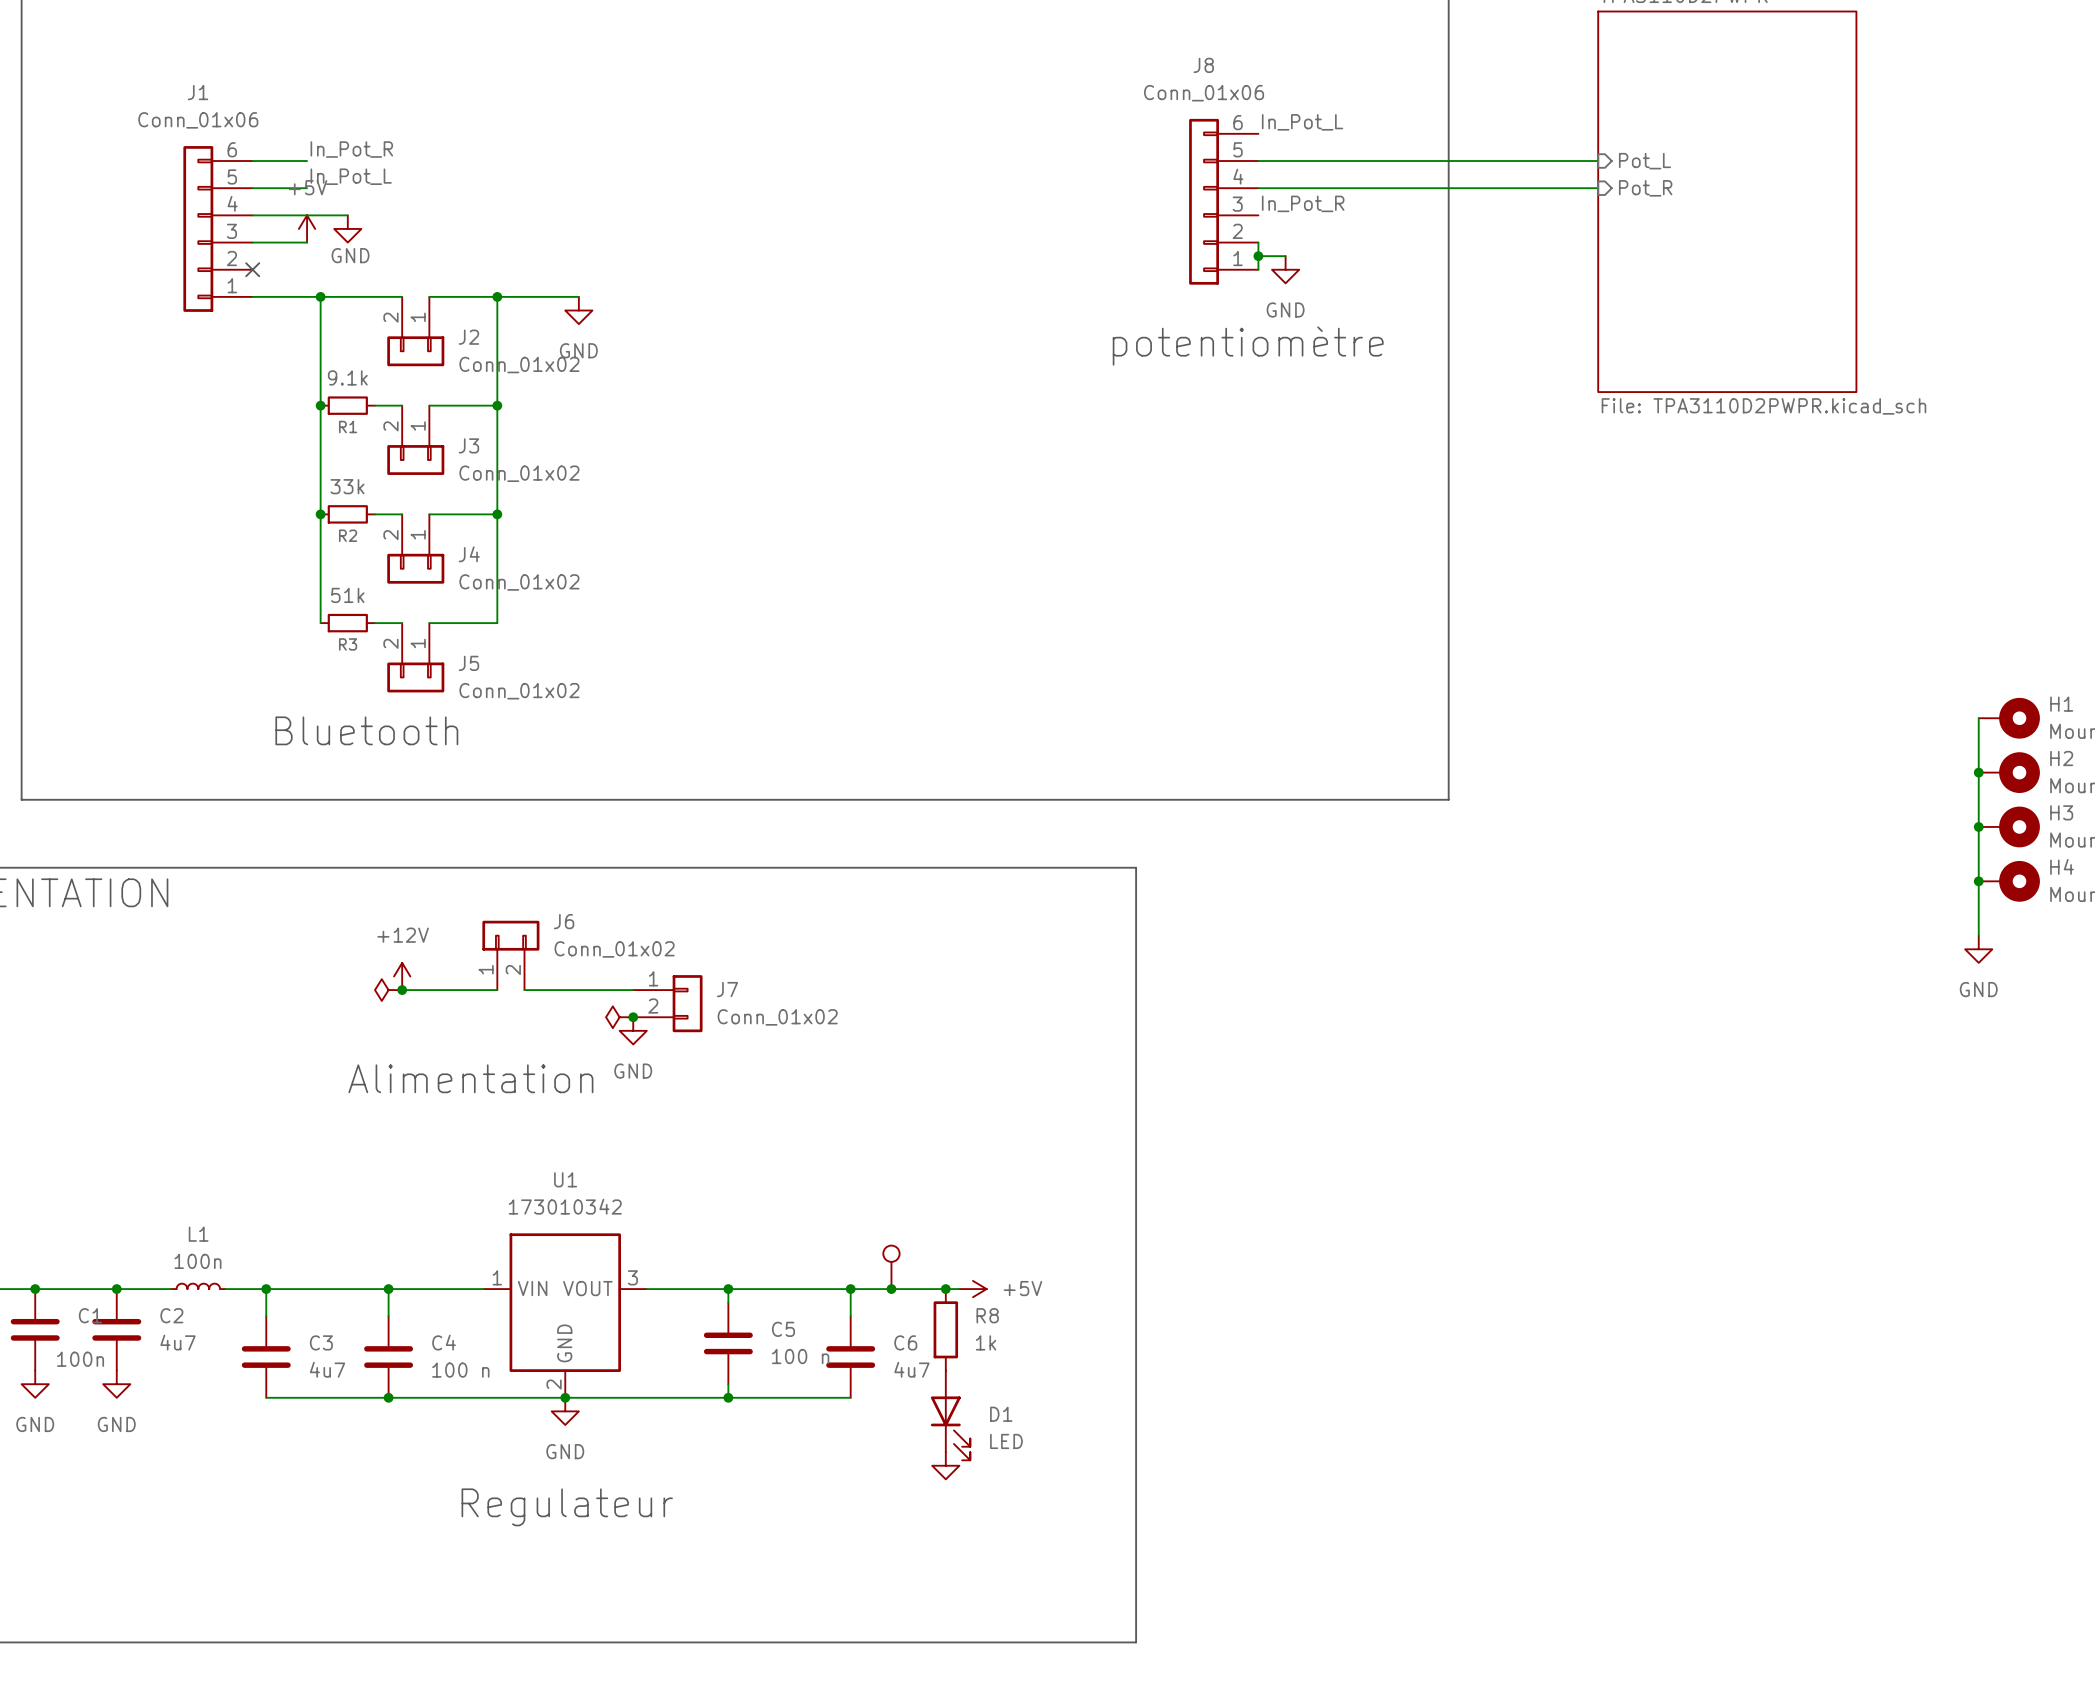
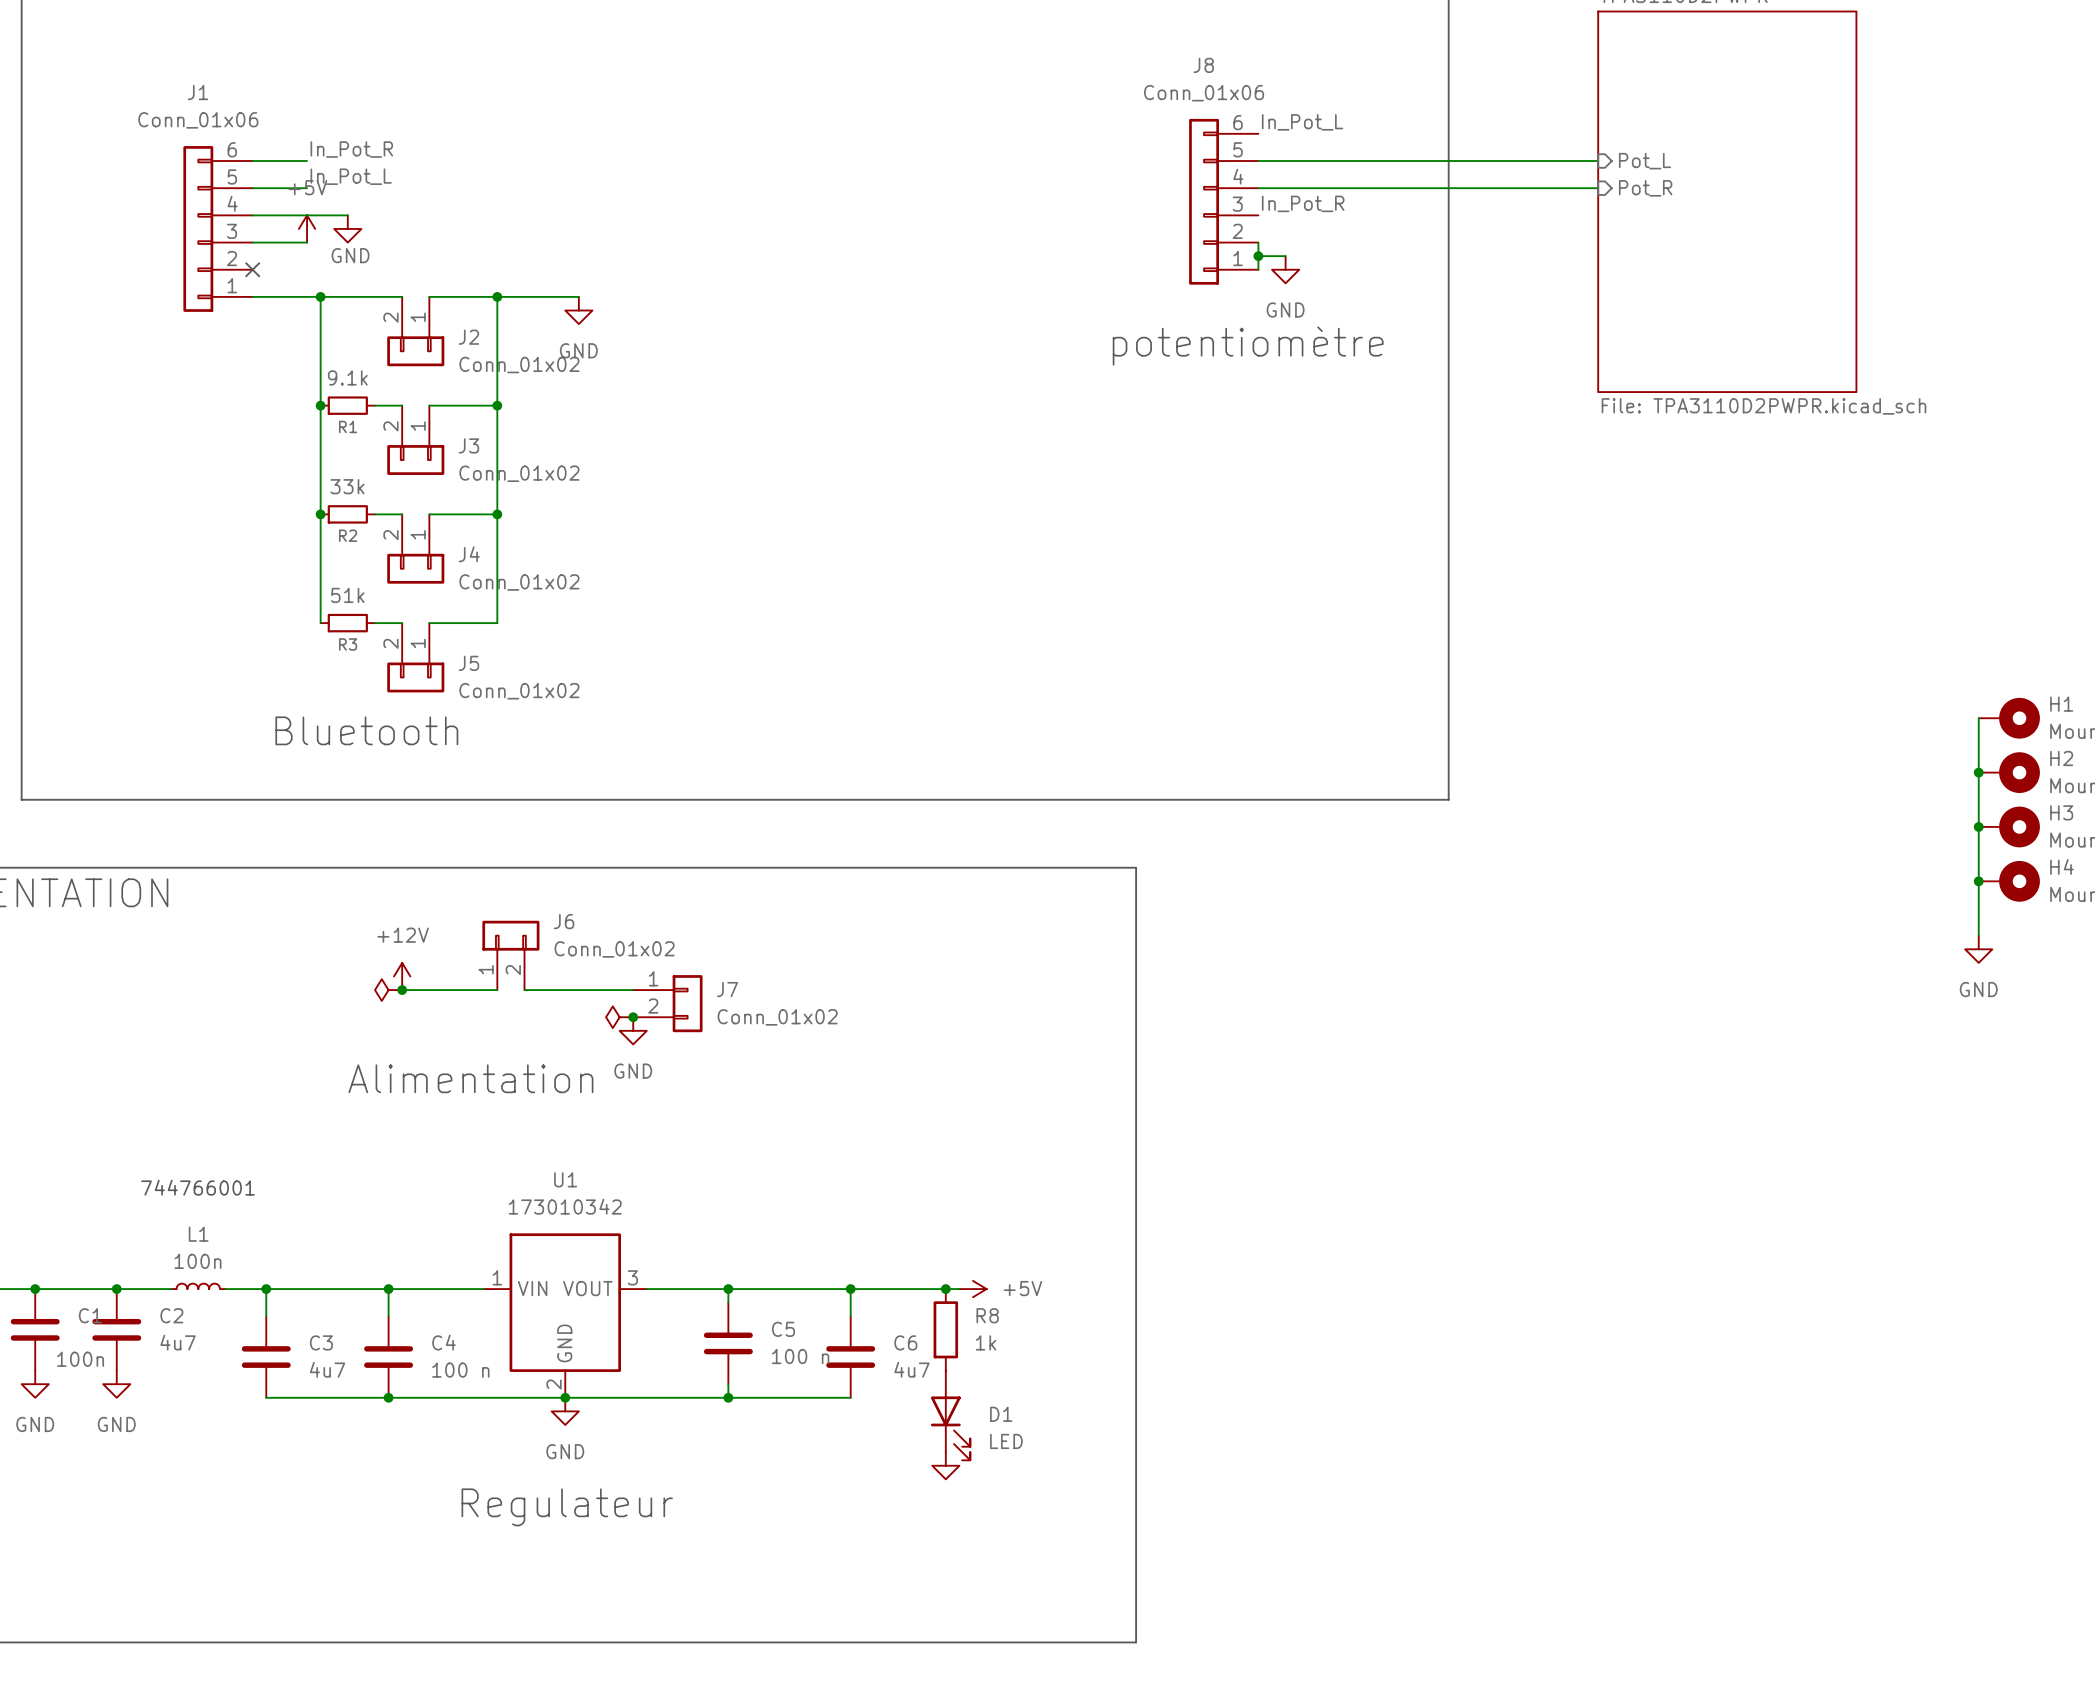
text: none -> 744766001 (197, 1187)
part: (891, 1267) -> none
junction: (891, 1289) -> none

